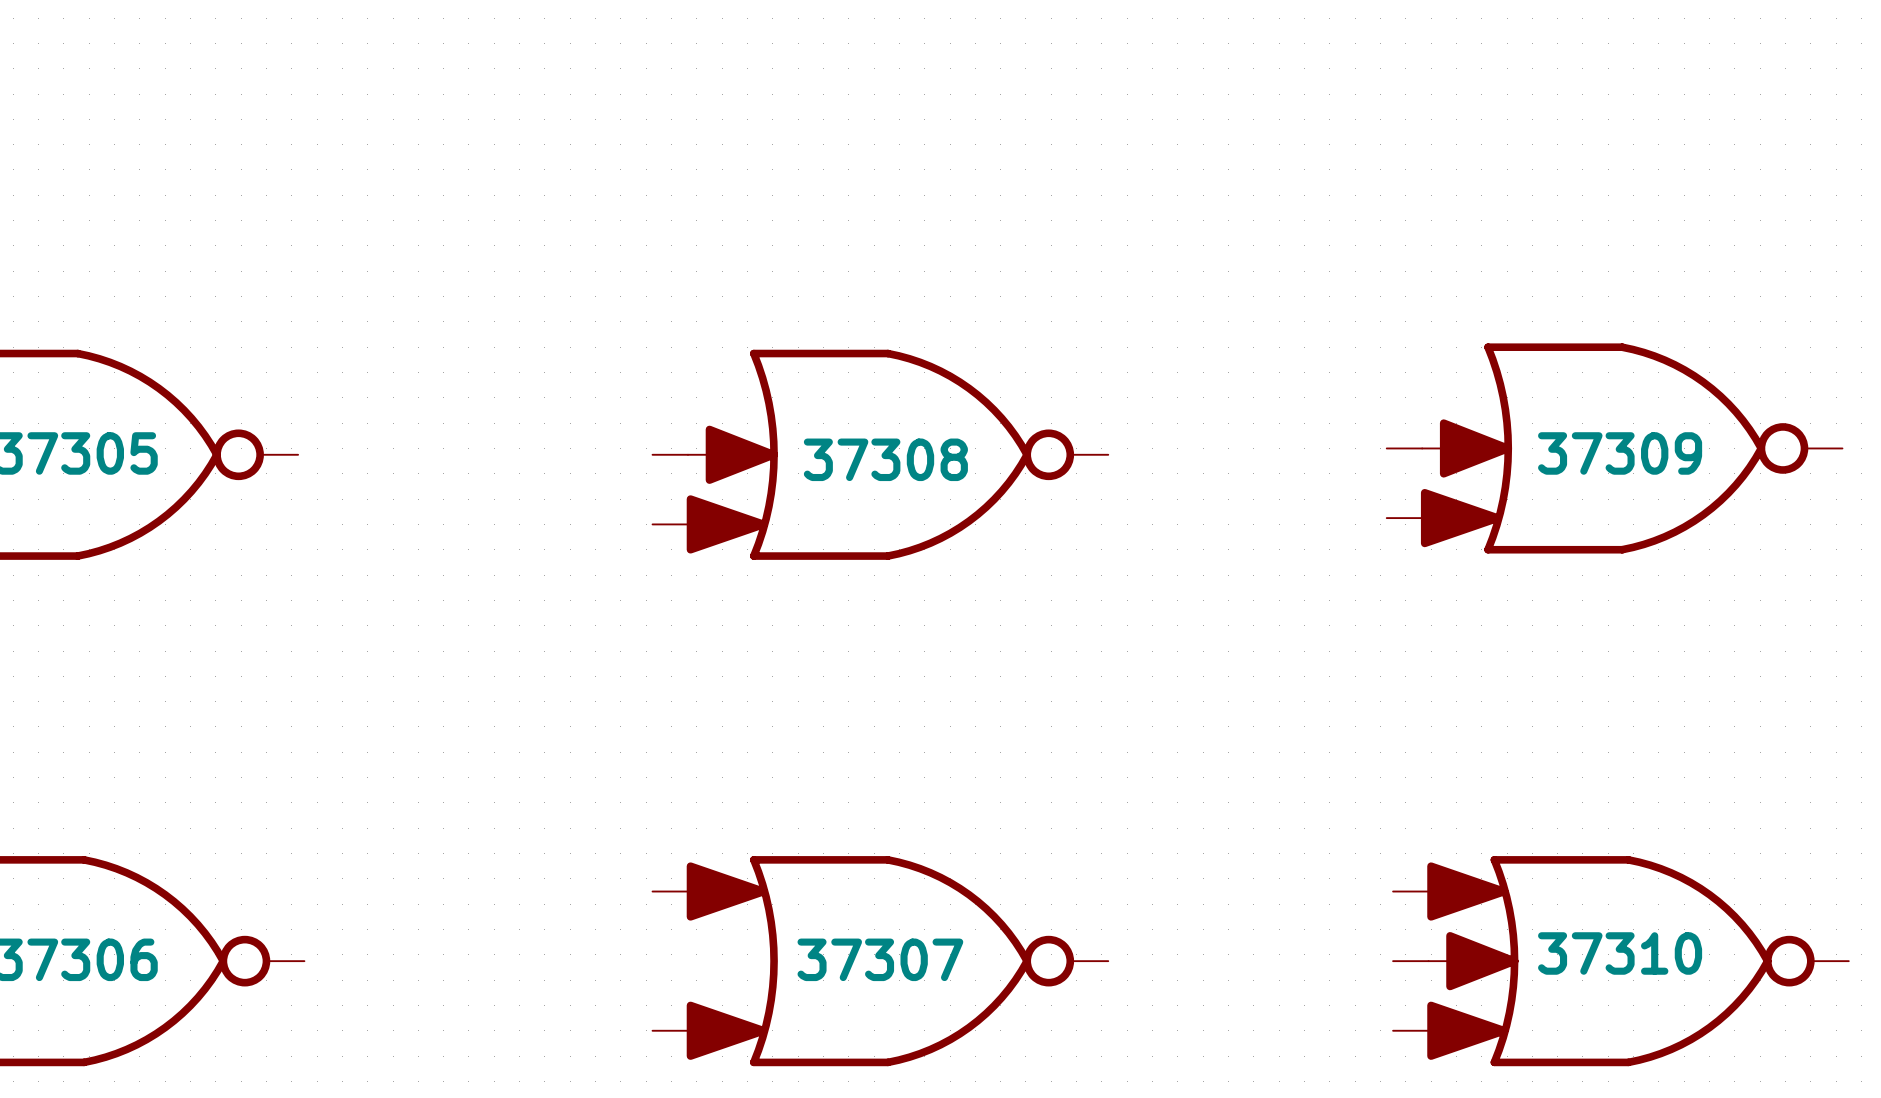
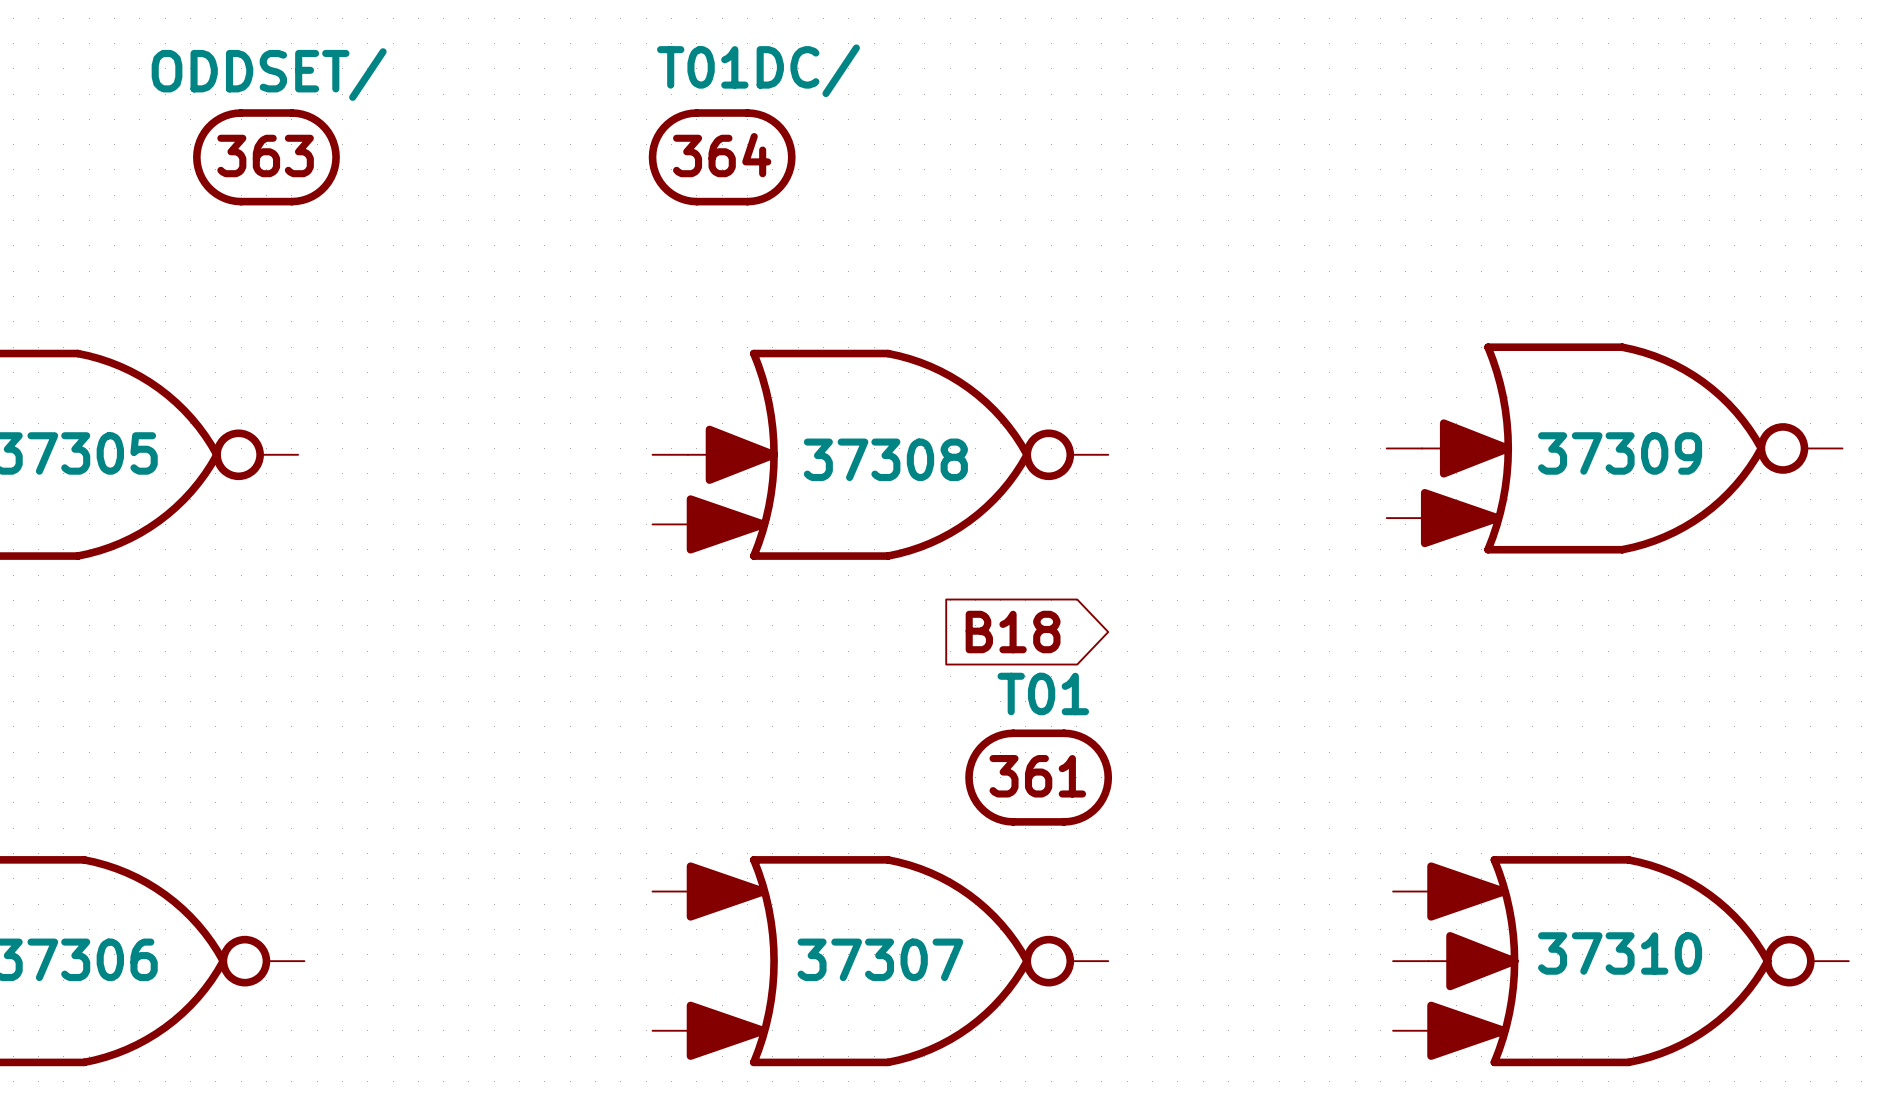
part: none -> (266, 157)
part: none -> (722, 157)
global label: none -> B18 (1013, 632)
part: none -> (1038, 777)

